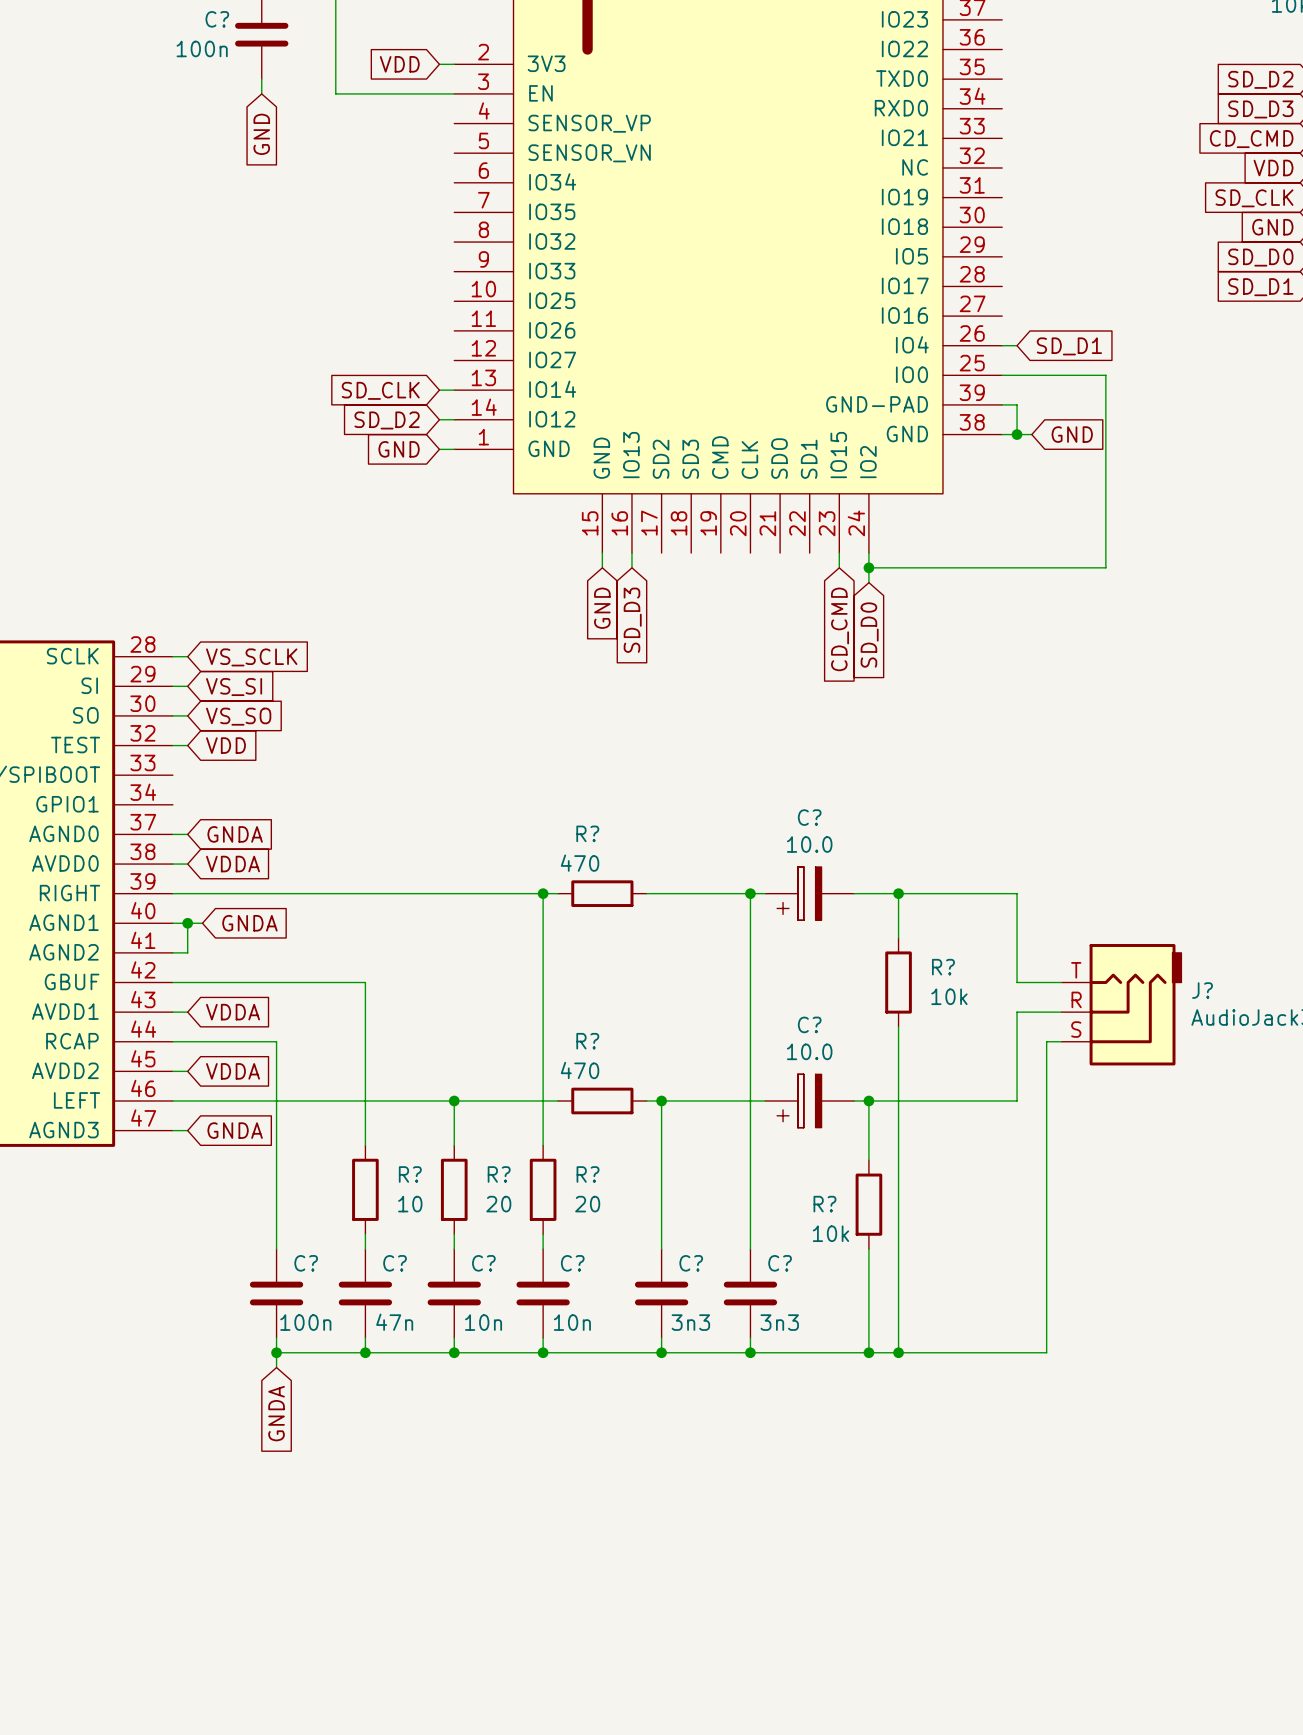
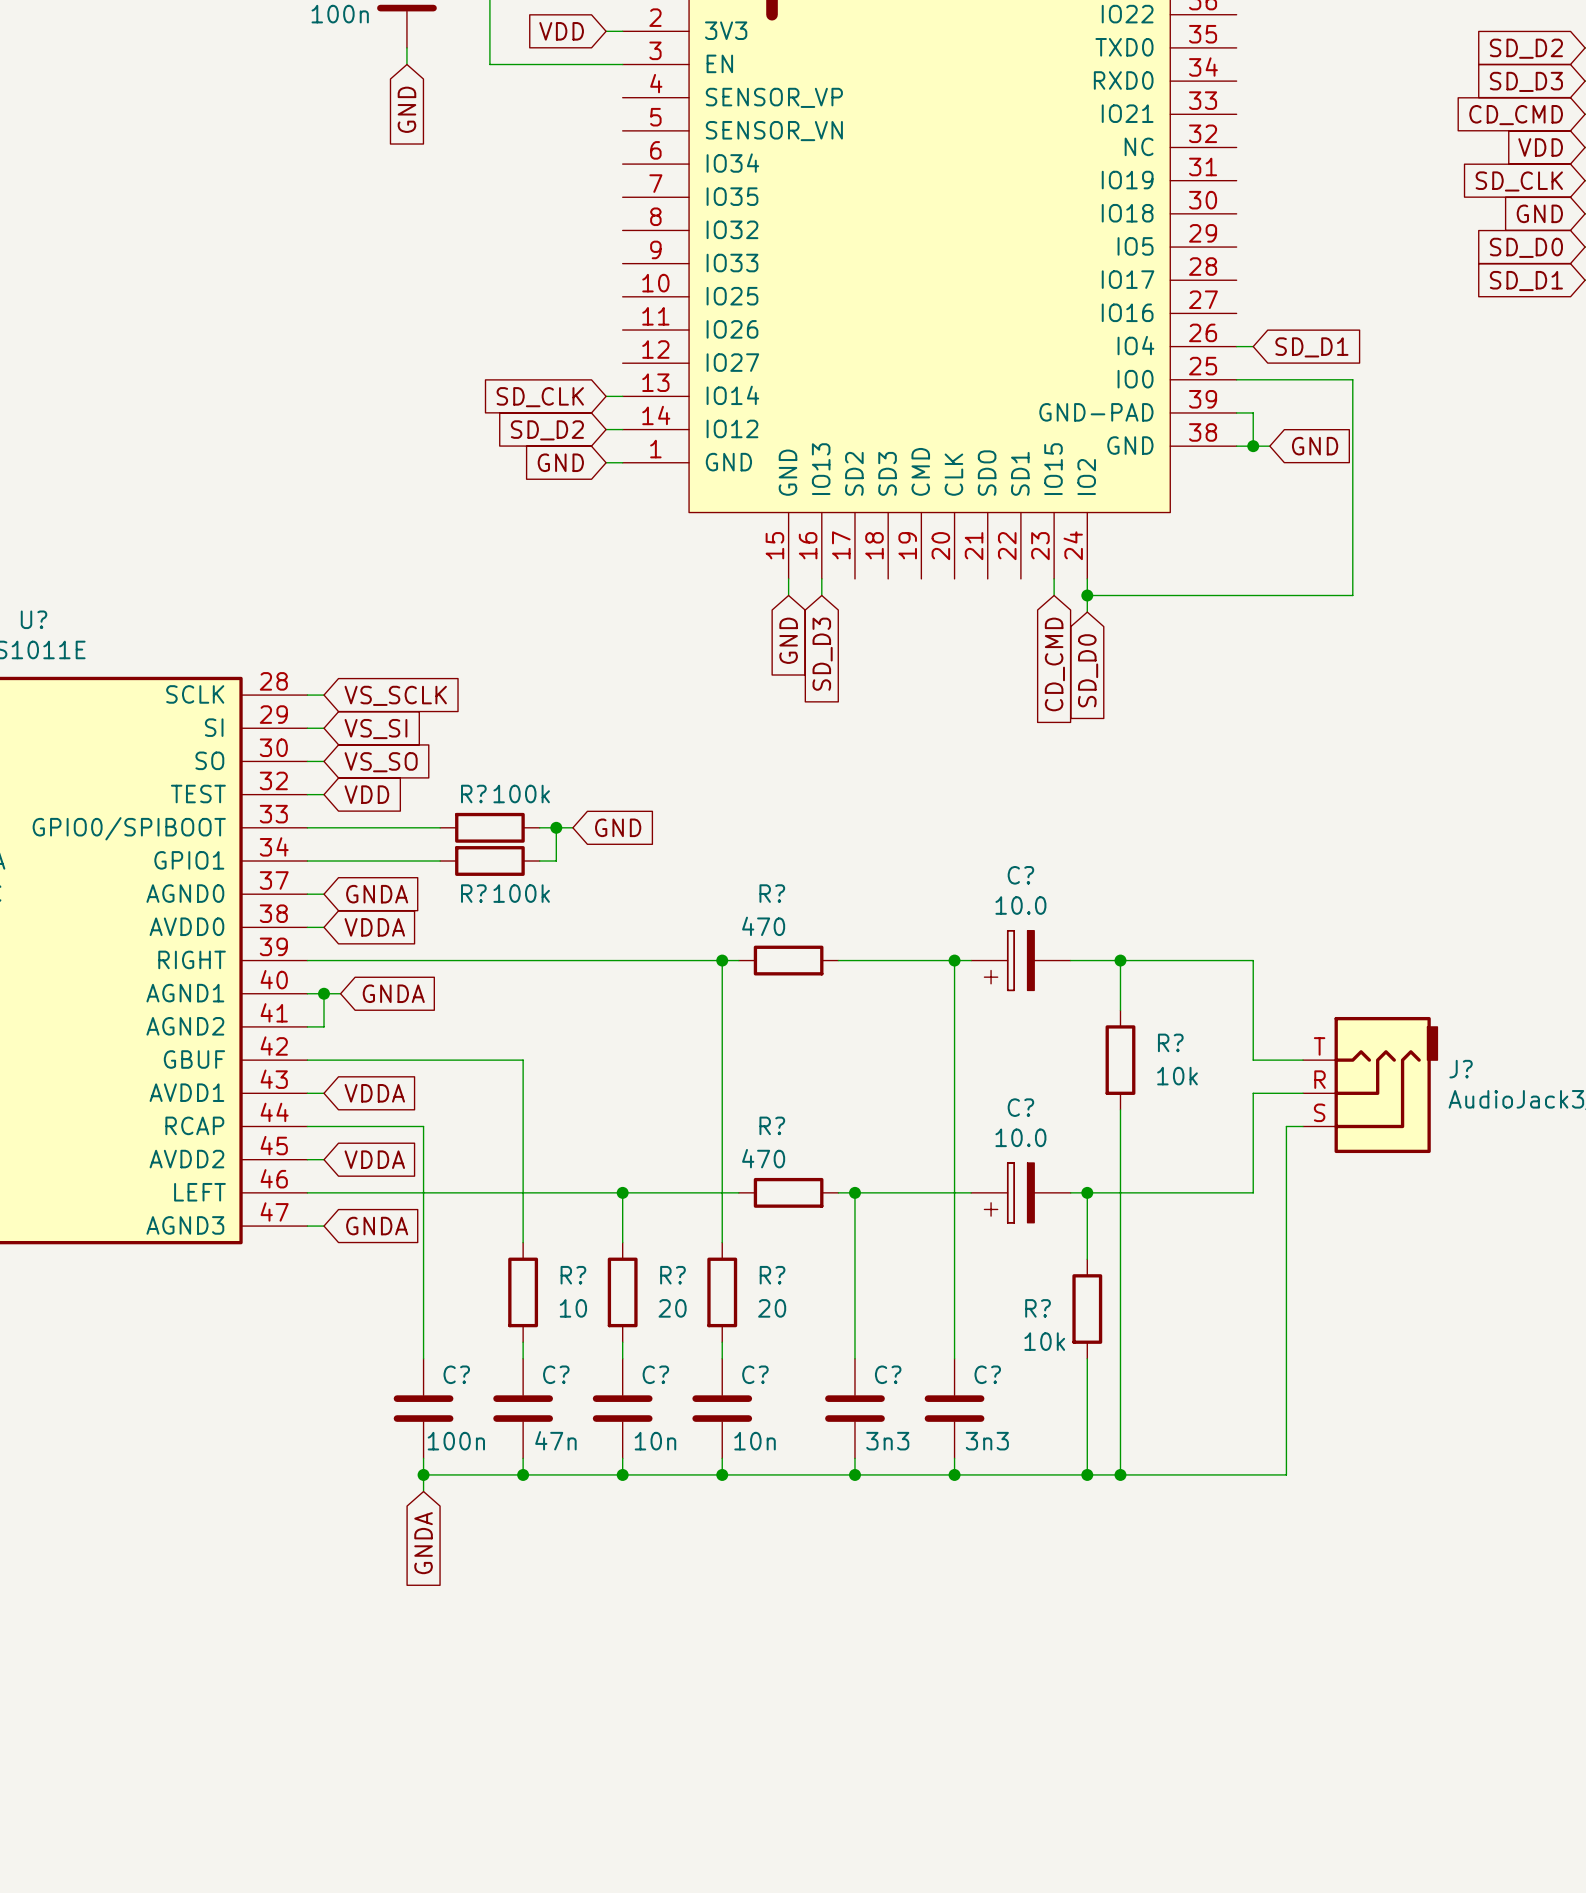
wire: none -> (307, 827) (440, 827)
R?: none -> 100k (489, 827)
wire: none -> (539, 827) (572, 827)
wire: none -> (556, 827) (556, 861) (539, 861)
junction: none -> (556, 827)
global label: none -> GND (618, 827)
wire: none -> (307, 861) (440, 861)
R?: none -> 100k (489, 861)

